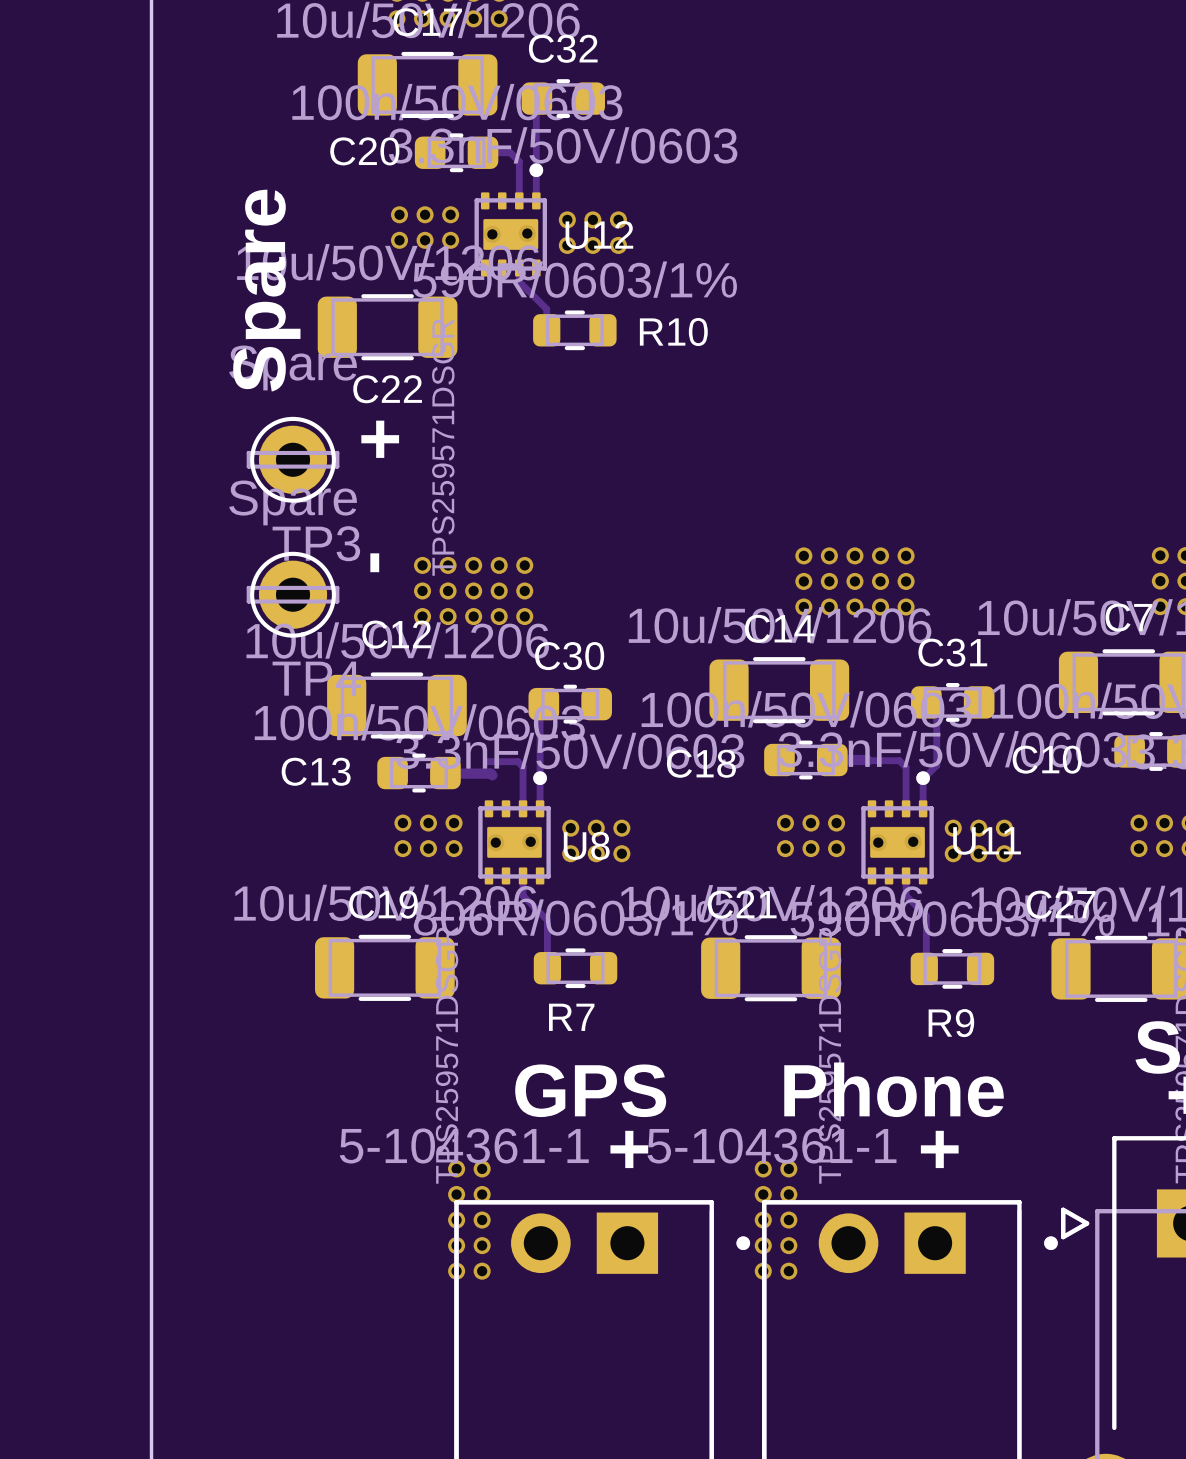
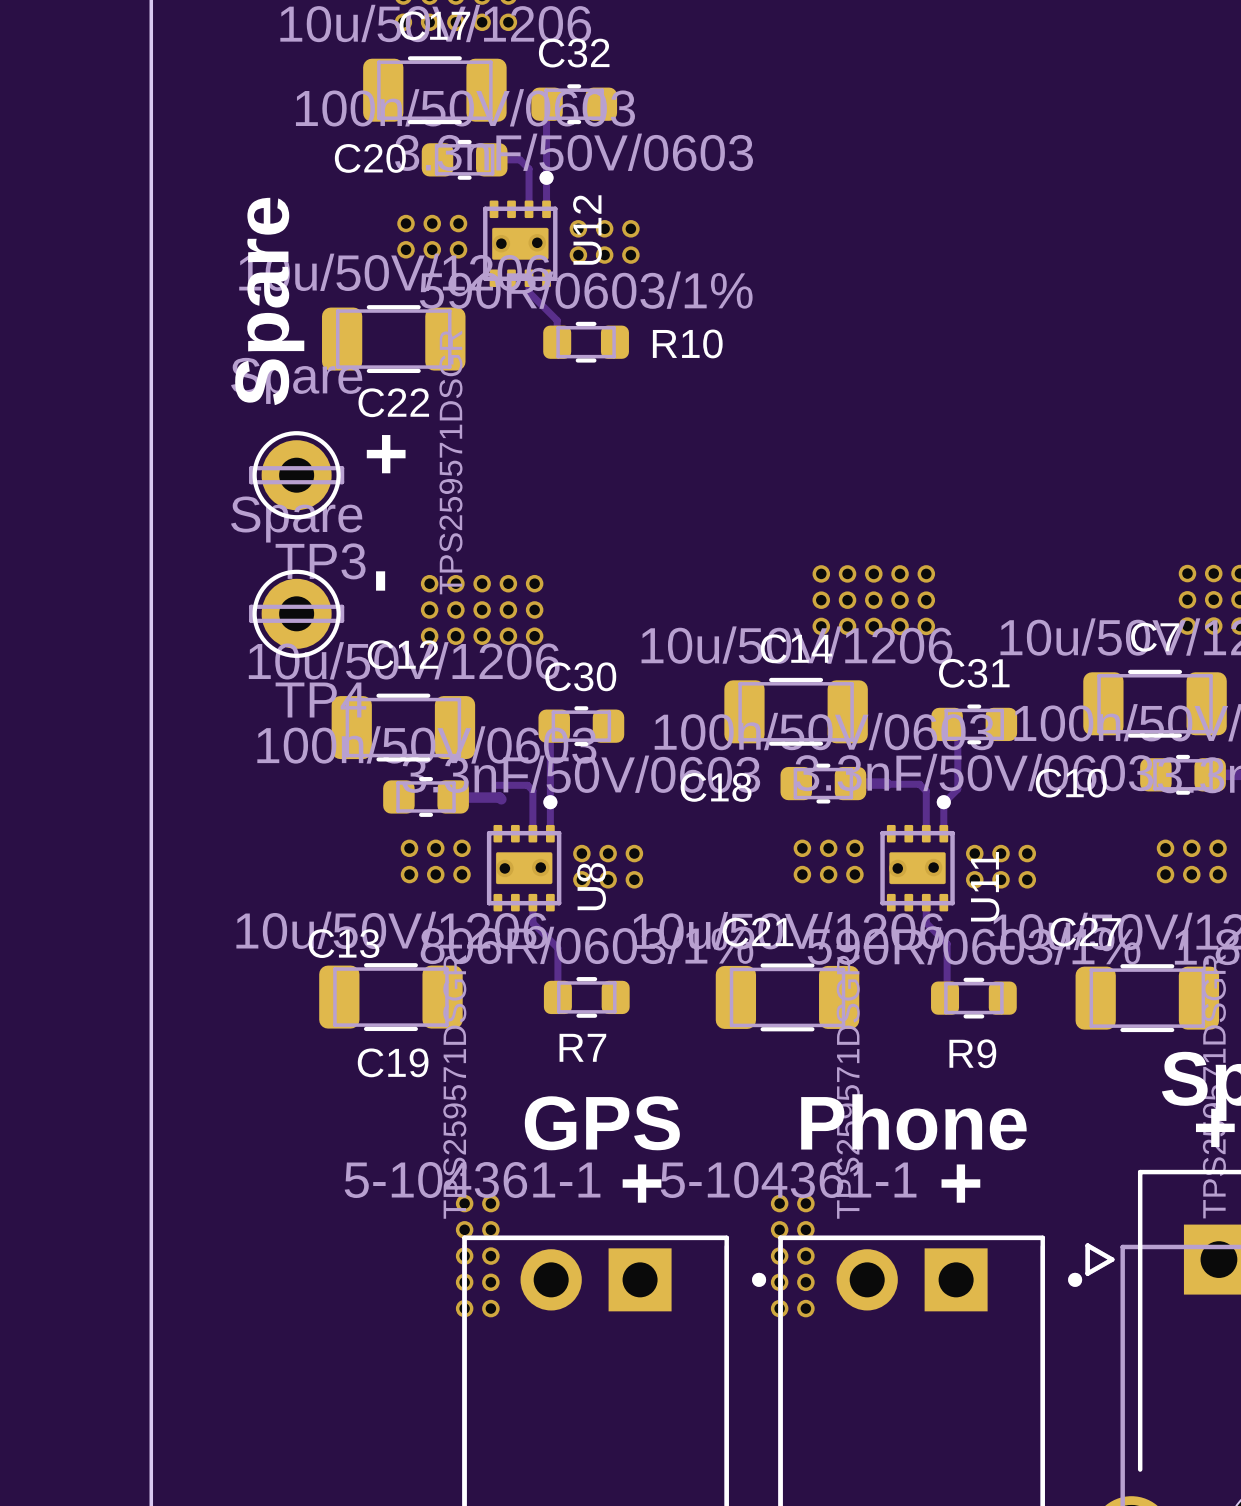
U12 name rotation: 0° (599, 235) -> 90° counterclockwise (587, 230)
C13 name position: C13 (316, 771) -> C13 (343, 943)
U11 name rotation: 0° (987, 840) -> 90° counterclockwise (985, 886)
U8 name rotation: 0° (586, 845) -> 90° counterclockwise (591, 886)
C19 name position: C19 (383, 904) -> C19 (393, 1062)

